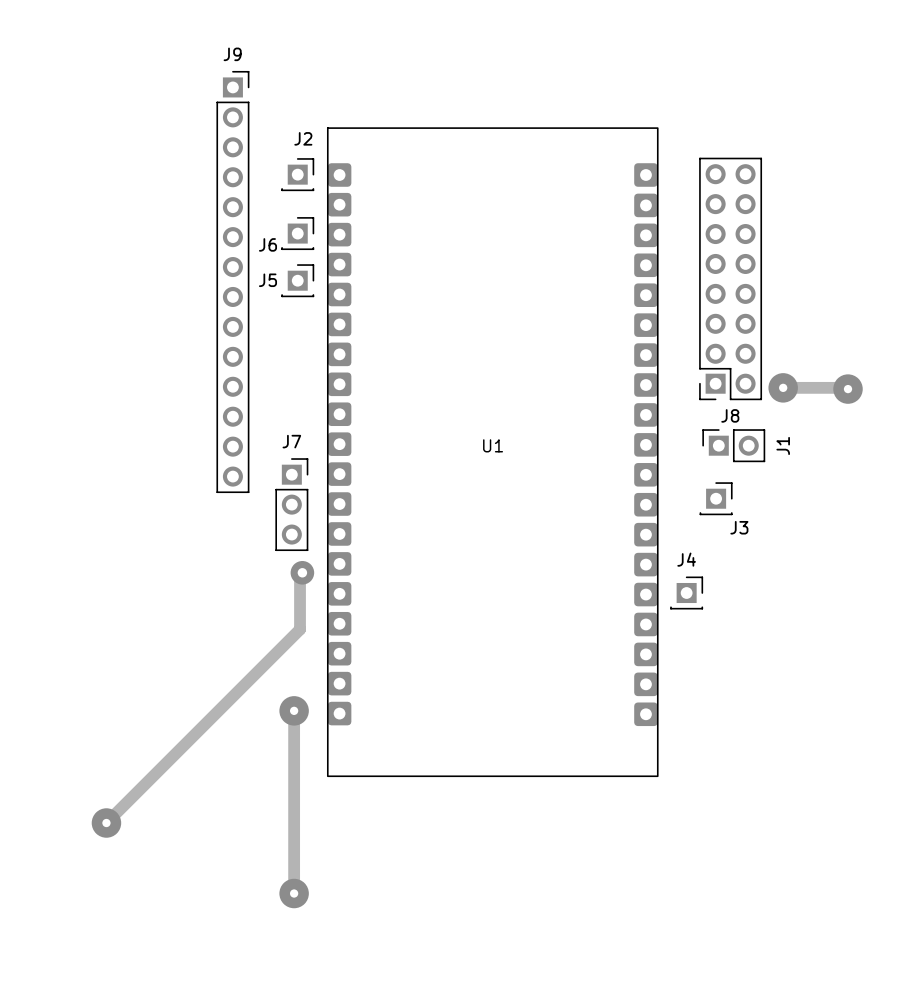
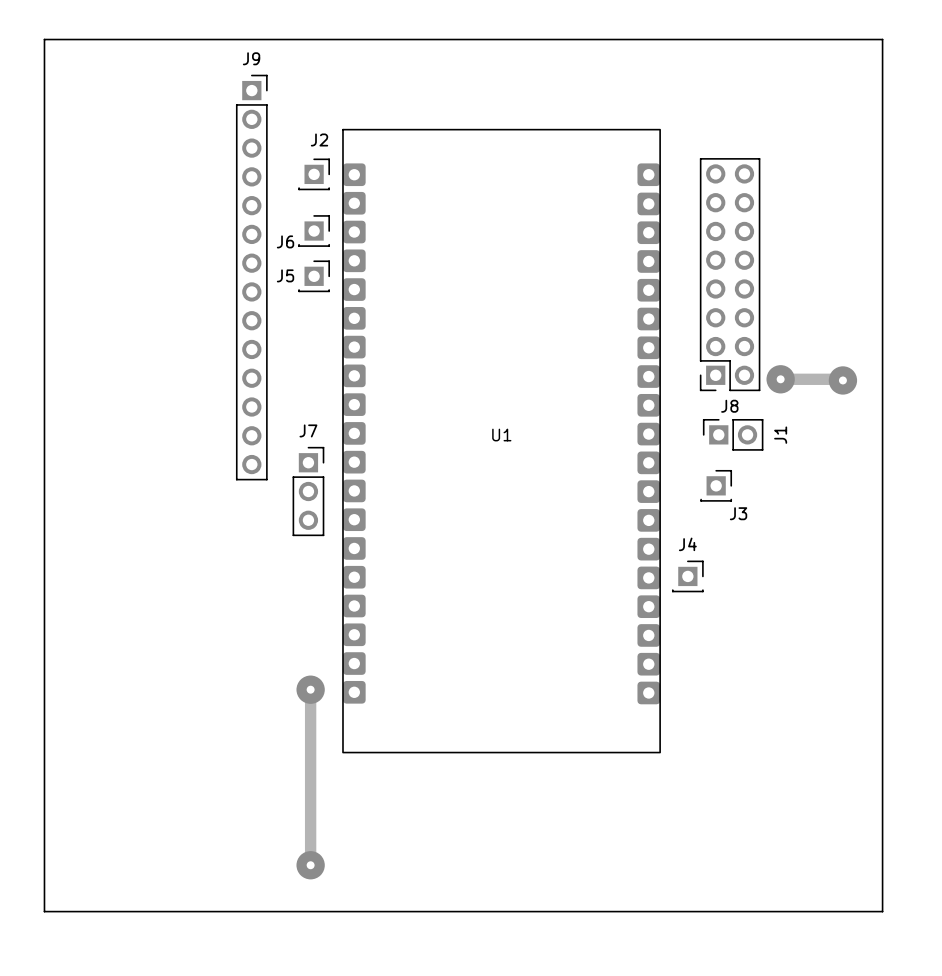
board edge: none -> (44, 39) (882, 39) (882, 911) (44, 911) (44, 39)
track: (302, 572) (300, 576) (300, 629) (111, 818) (105, 818) (106, 823) -> none
via: (302, 572) -> none
via: (106, 823) -> none

